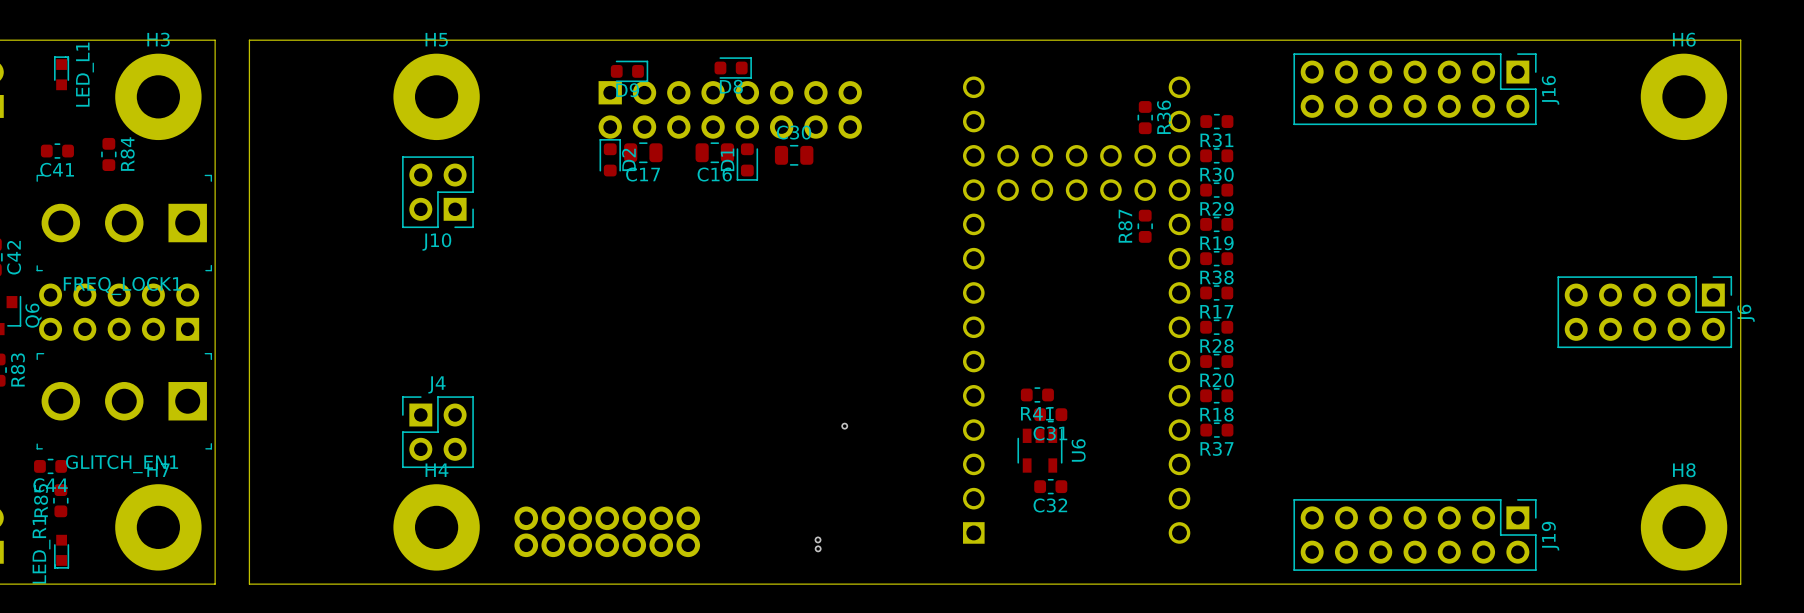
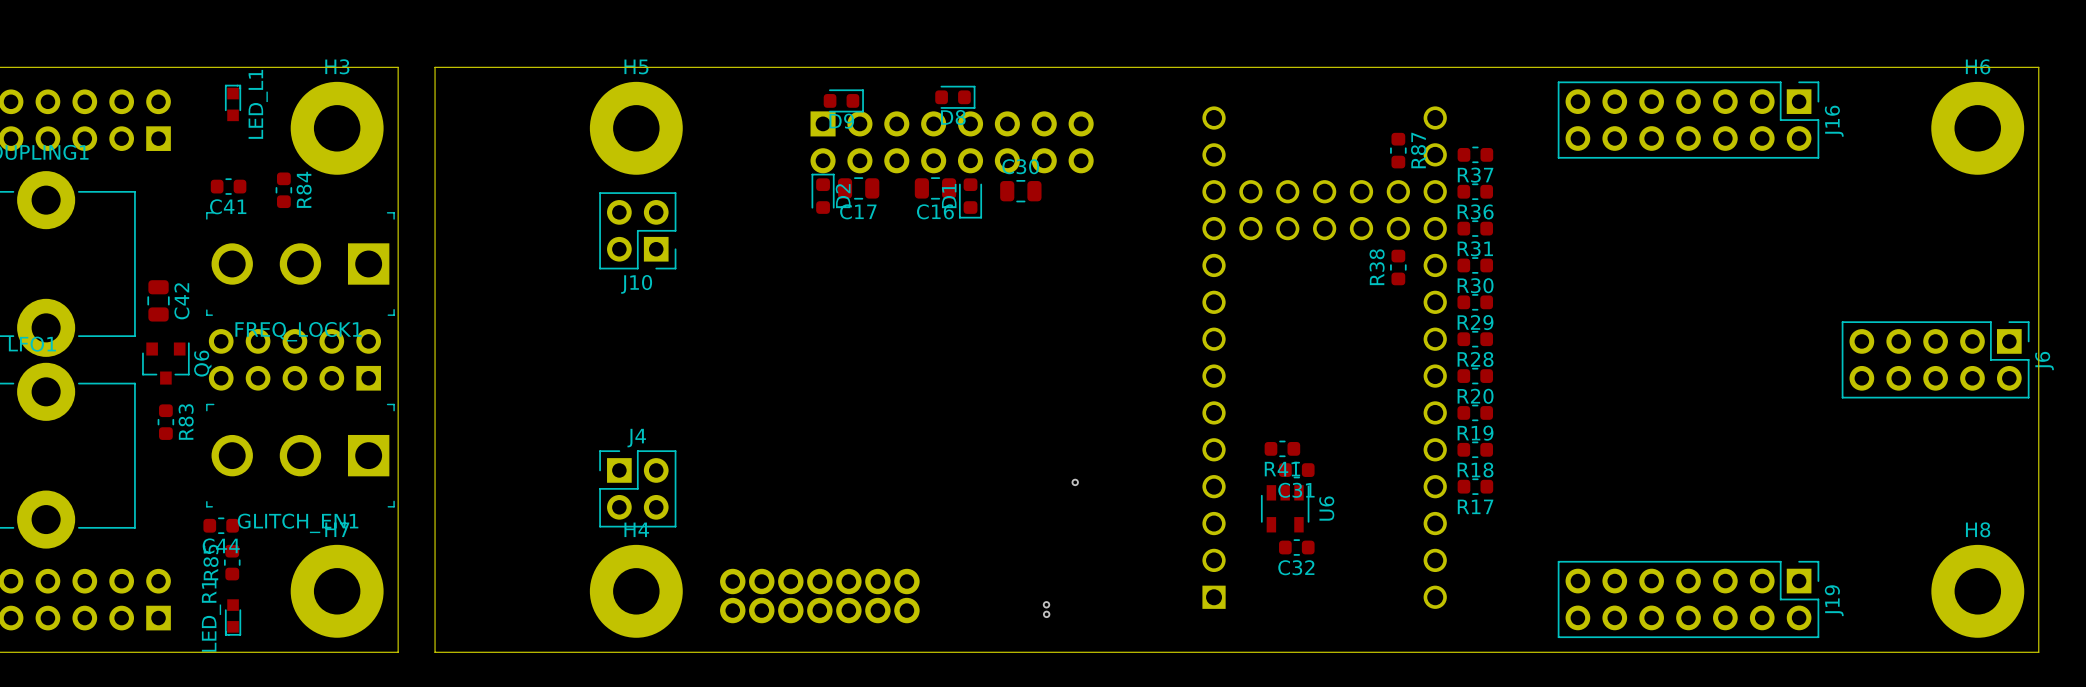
R36 name: R36 (1164, 117) -> R87 (1418, 150)
R31 name: R31 (1216, 140) -> R37 (1475, 175)
R30 name: R30 (1216, 174) -> R36 (1475, 211)
R29 name: R29 (1216, 208) -> R31 (1475, 248)
R87 name: R87 (1125, 226) -> R38 (1377, 267)
R19 name: R19 (1216, 243) -> R30 (1475, 285)
R38 name: R38 (1216, 277) -> R29 (1475, 322)
R17 name: R17 (1216, 311) -> R28 (1475, 359)
R28 name: R28 (1216, 346) -> R20 (1475, 396)
R20 name: R20 (1216, 380) -> R19 (1475, 433)
R37 name: R37 (1216, 448) -> R17 (1475, 506)

